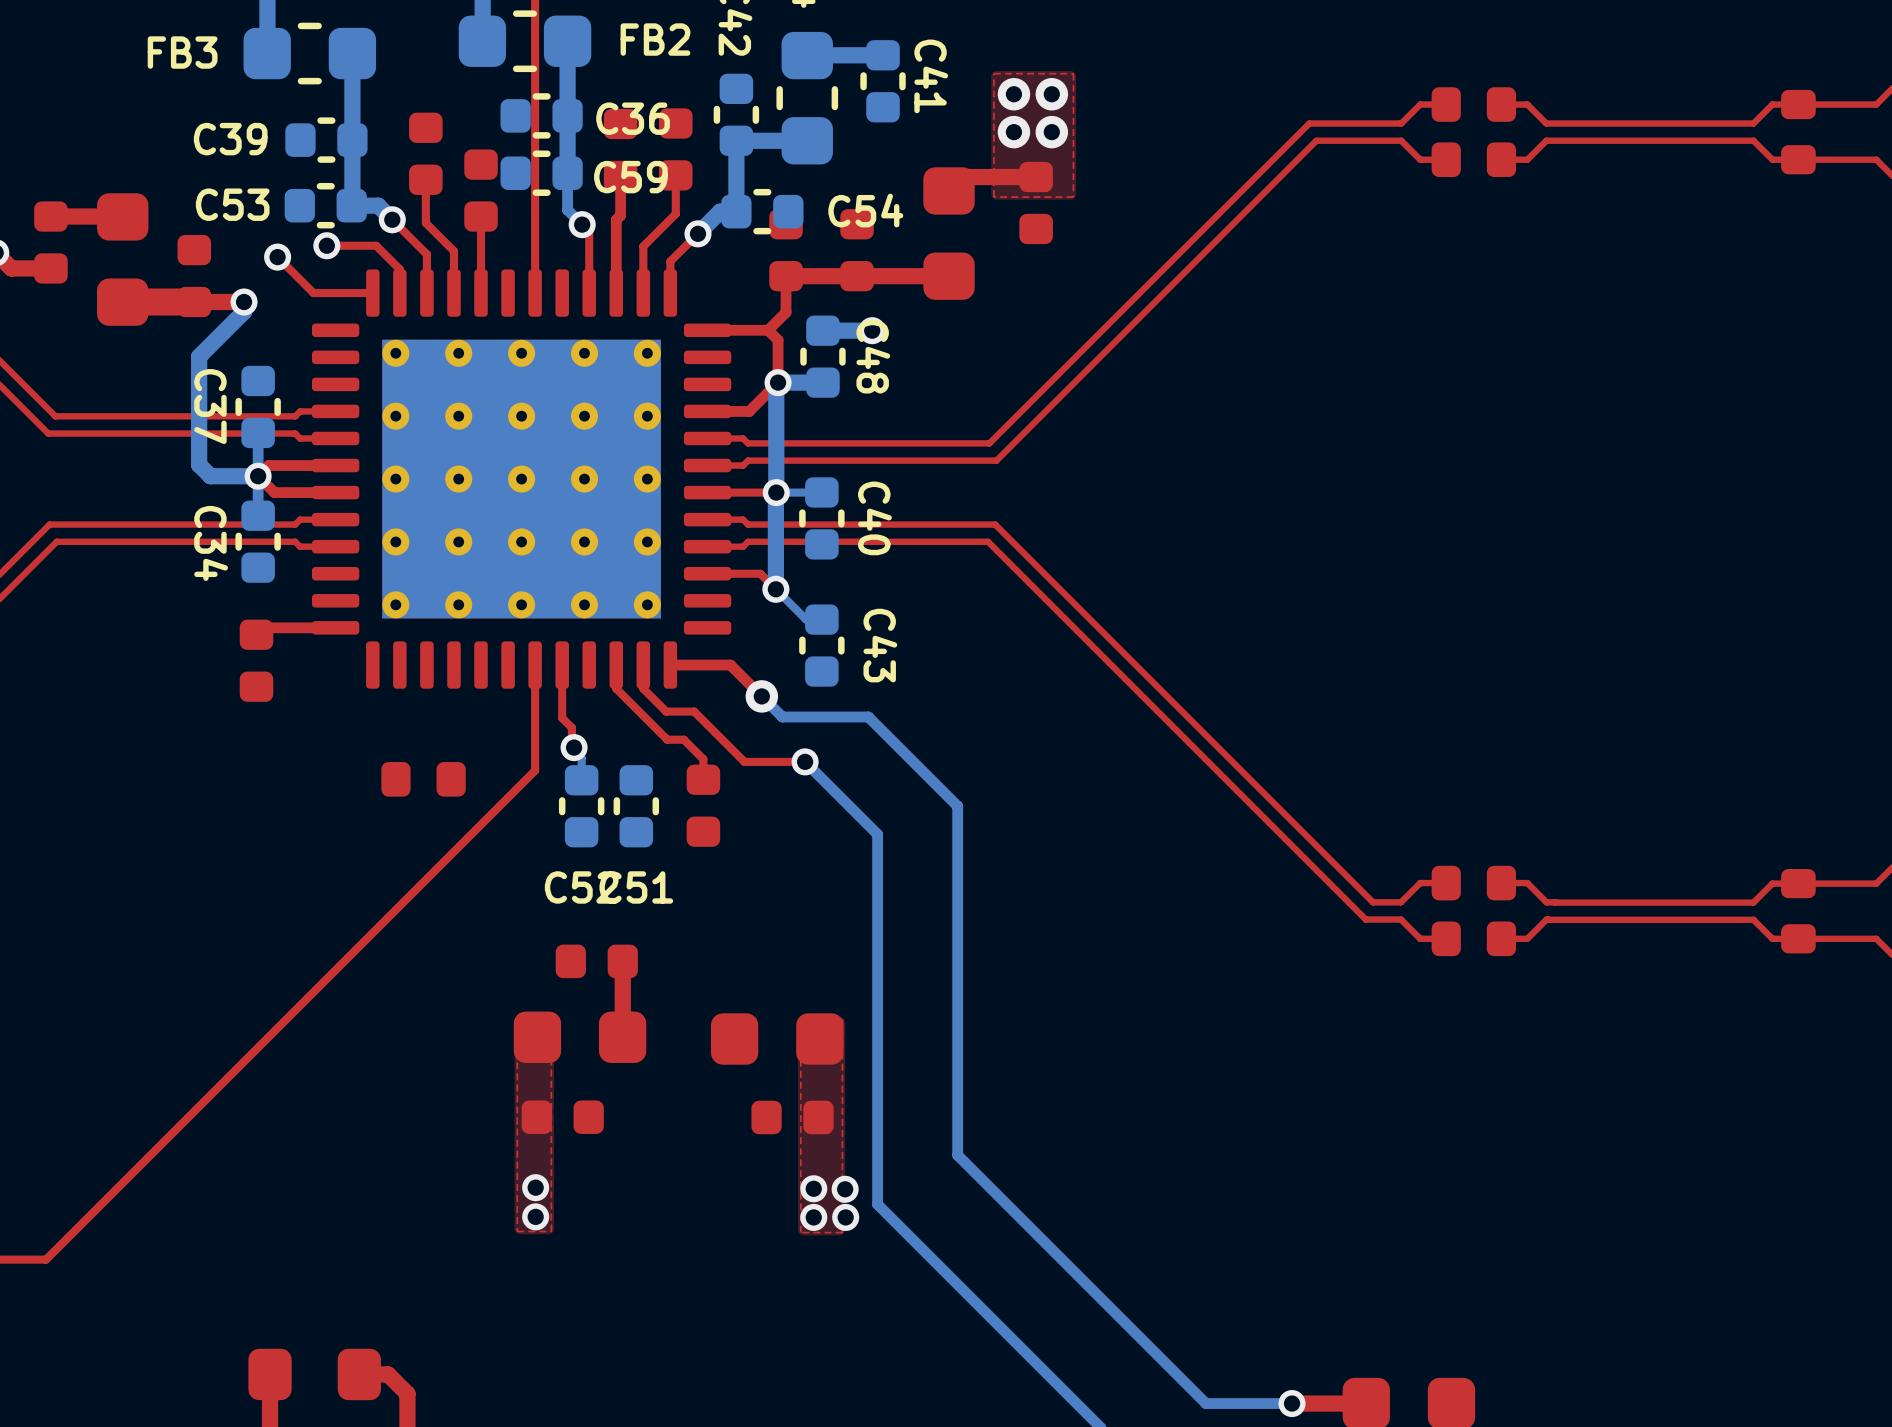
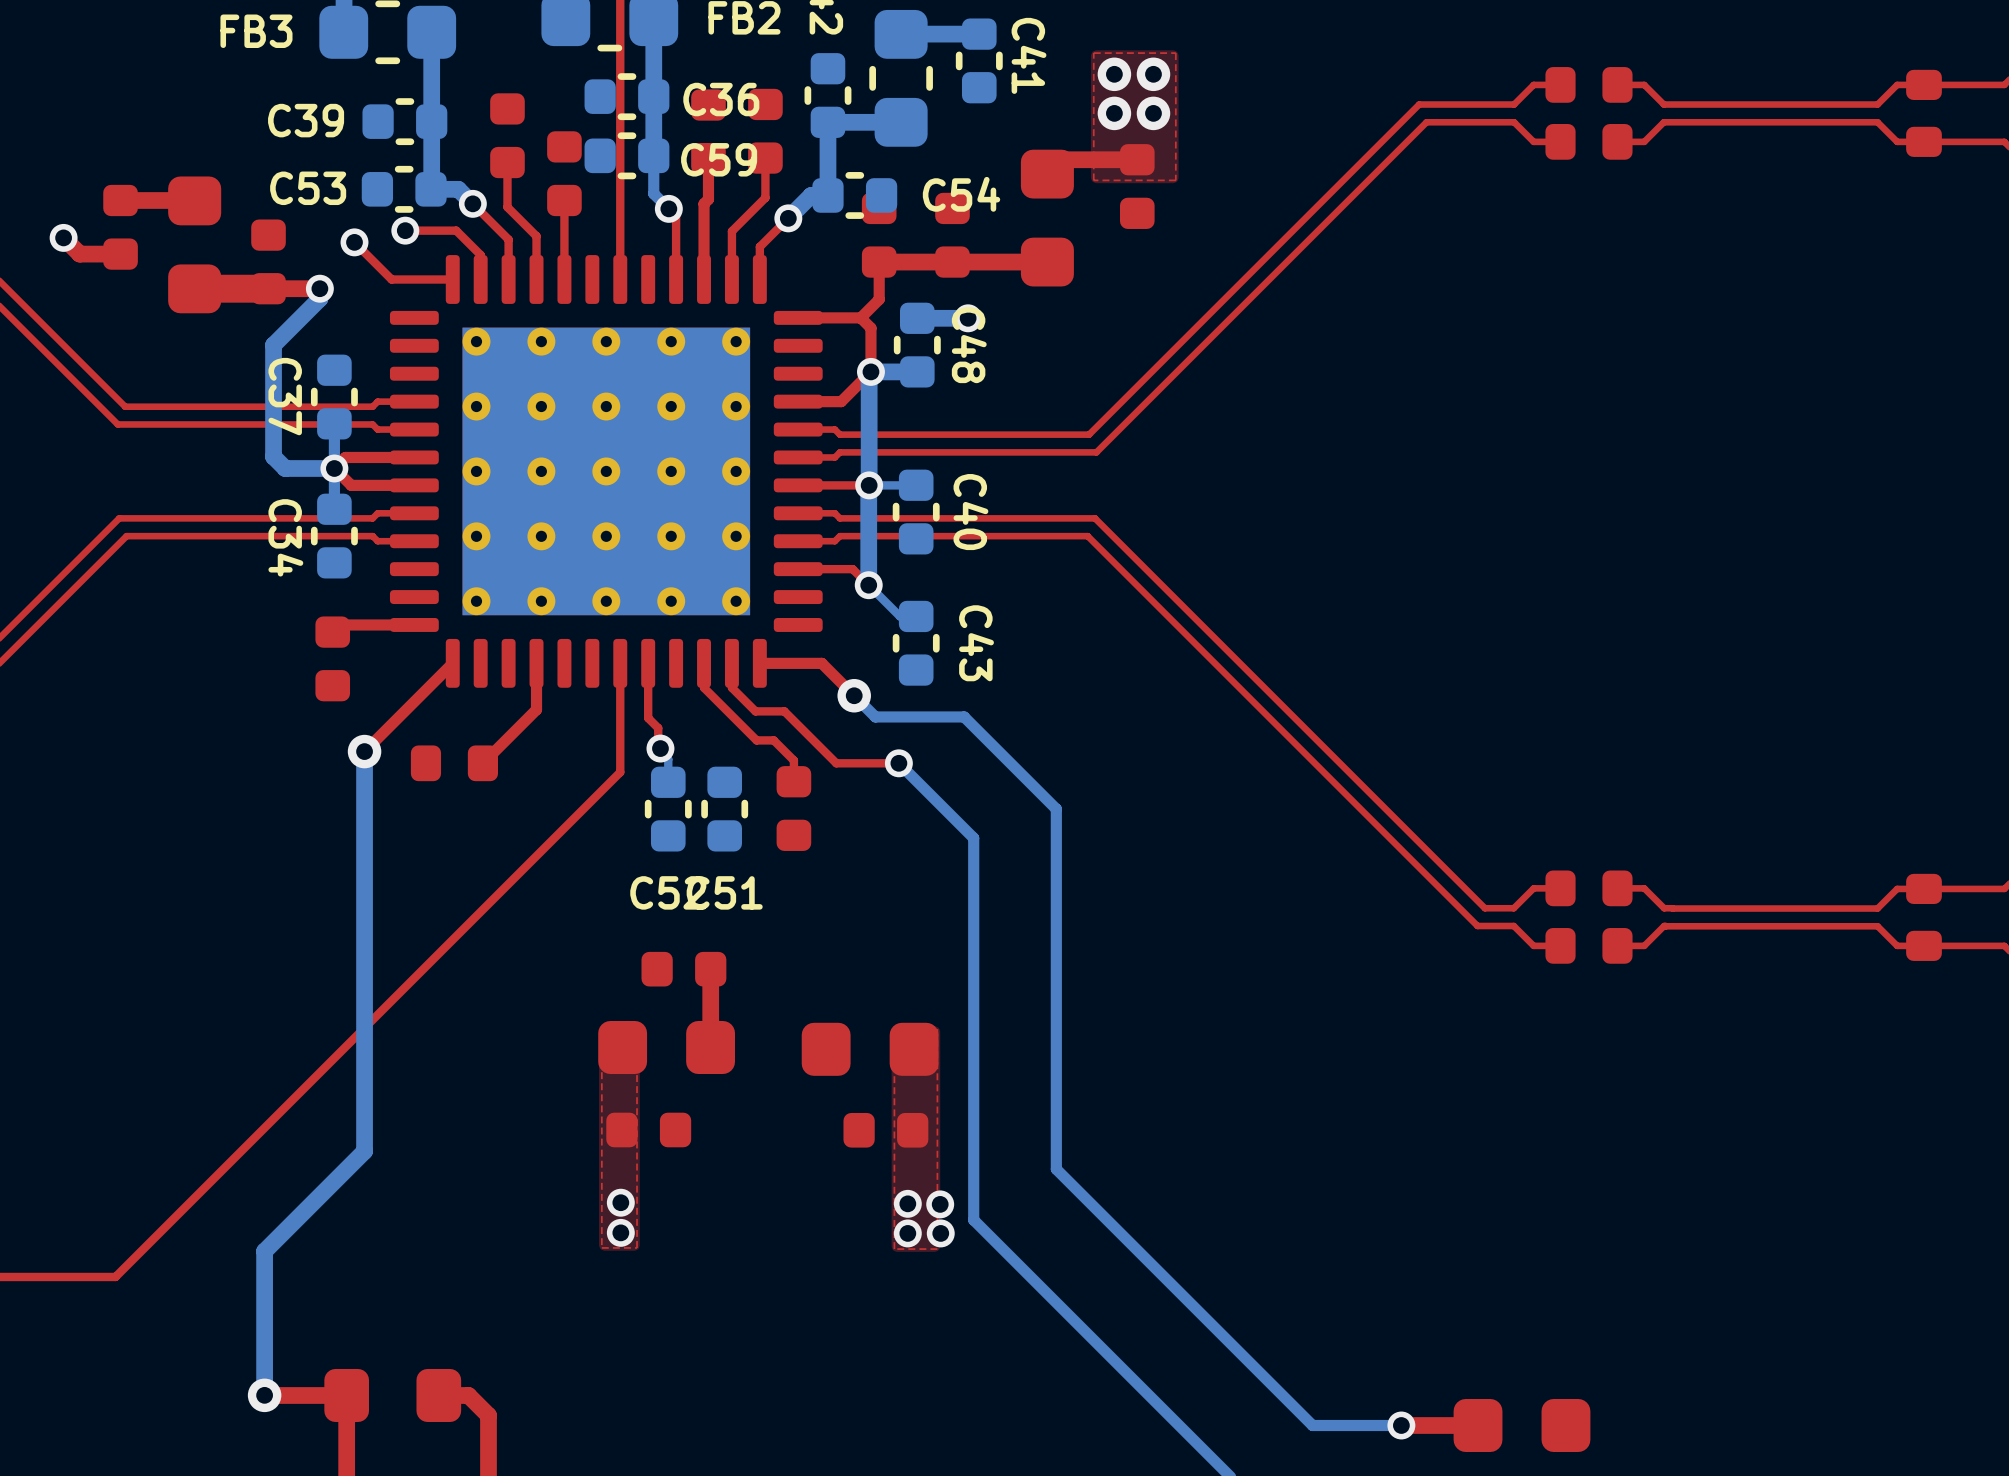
top track: none -> (452, 663) (364, 751)
top track: none -> (536, 663) (536, 709) (482, 763)
bottom track: none -> (364, 751) (364, 1151) (264, 1251) (264, 1395)
via: none -> (364, 751)
part position: (423, 779) -> (454, 763)
via: none -> (264, 1395)
top track: none -> (346, 1395) (264, 1395)

